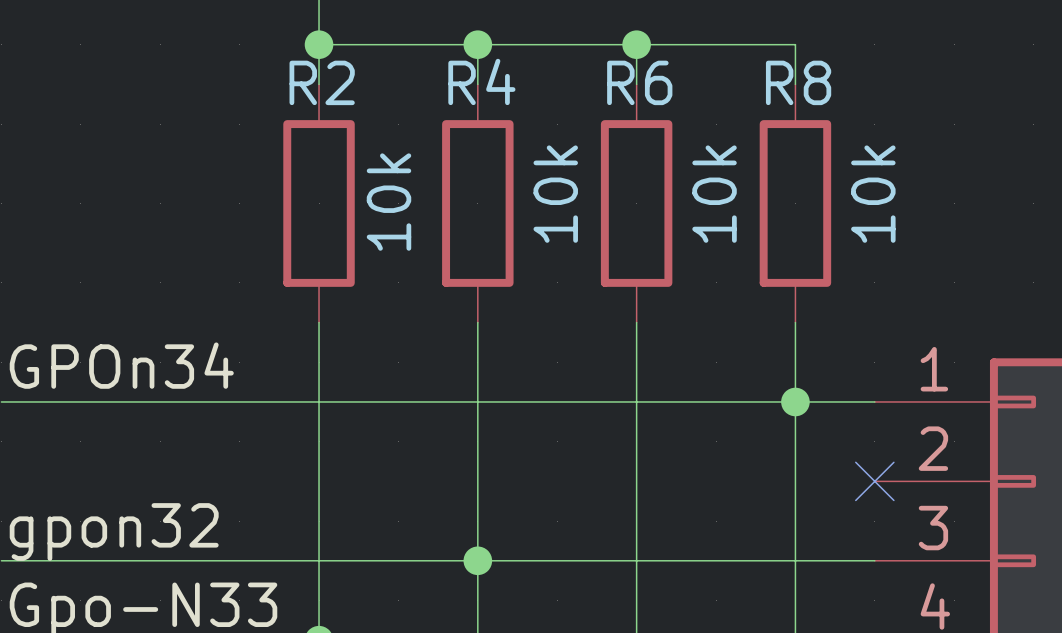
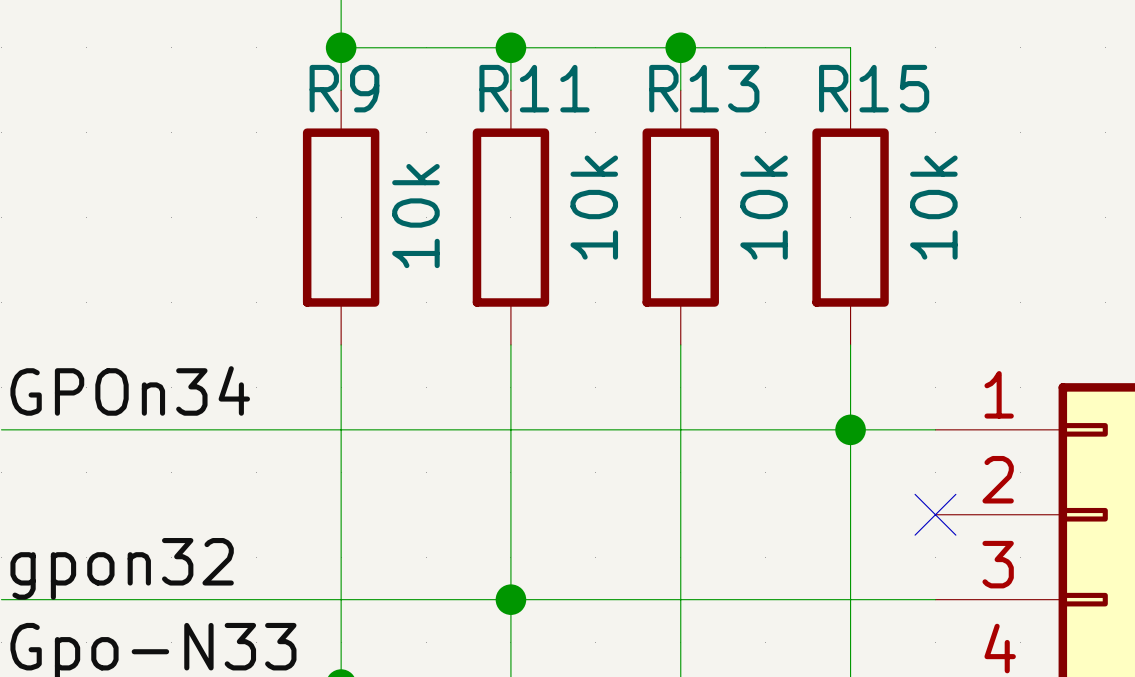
R4 name: R4 (481, 81) -> R11 (534, 88)
R2 name: R2 (322, 82) -> R9 (344, 88)
R6 name: R6 (639, 82) -> R13 (704, 88)
R8 name: R8 (798, 82) -> R15 (874, 88)

